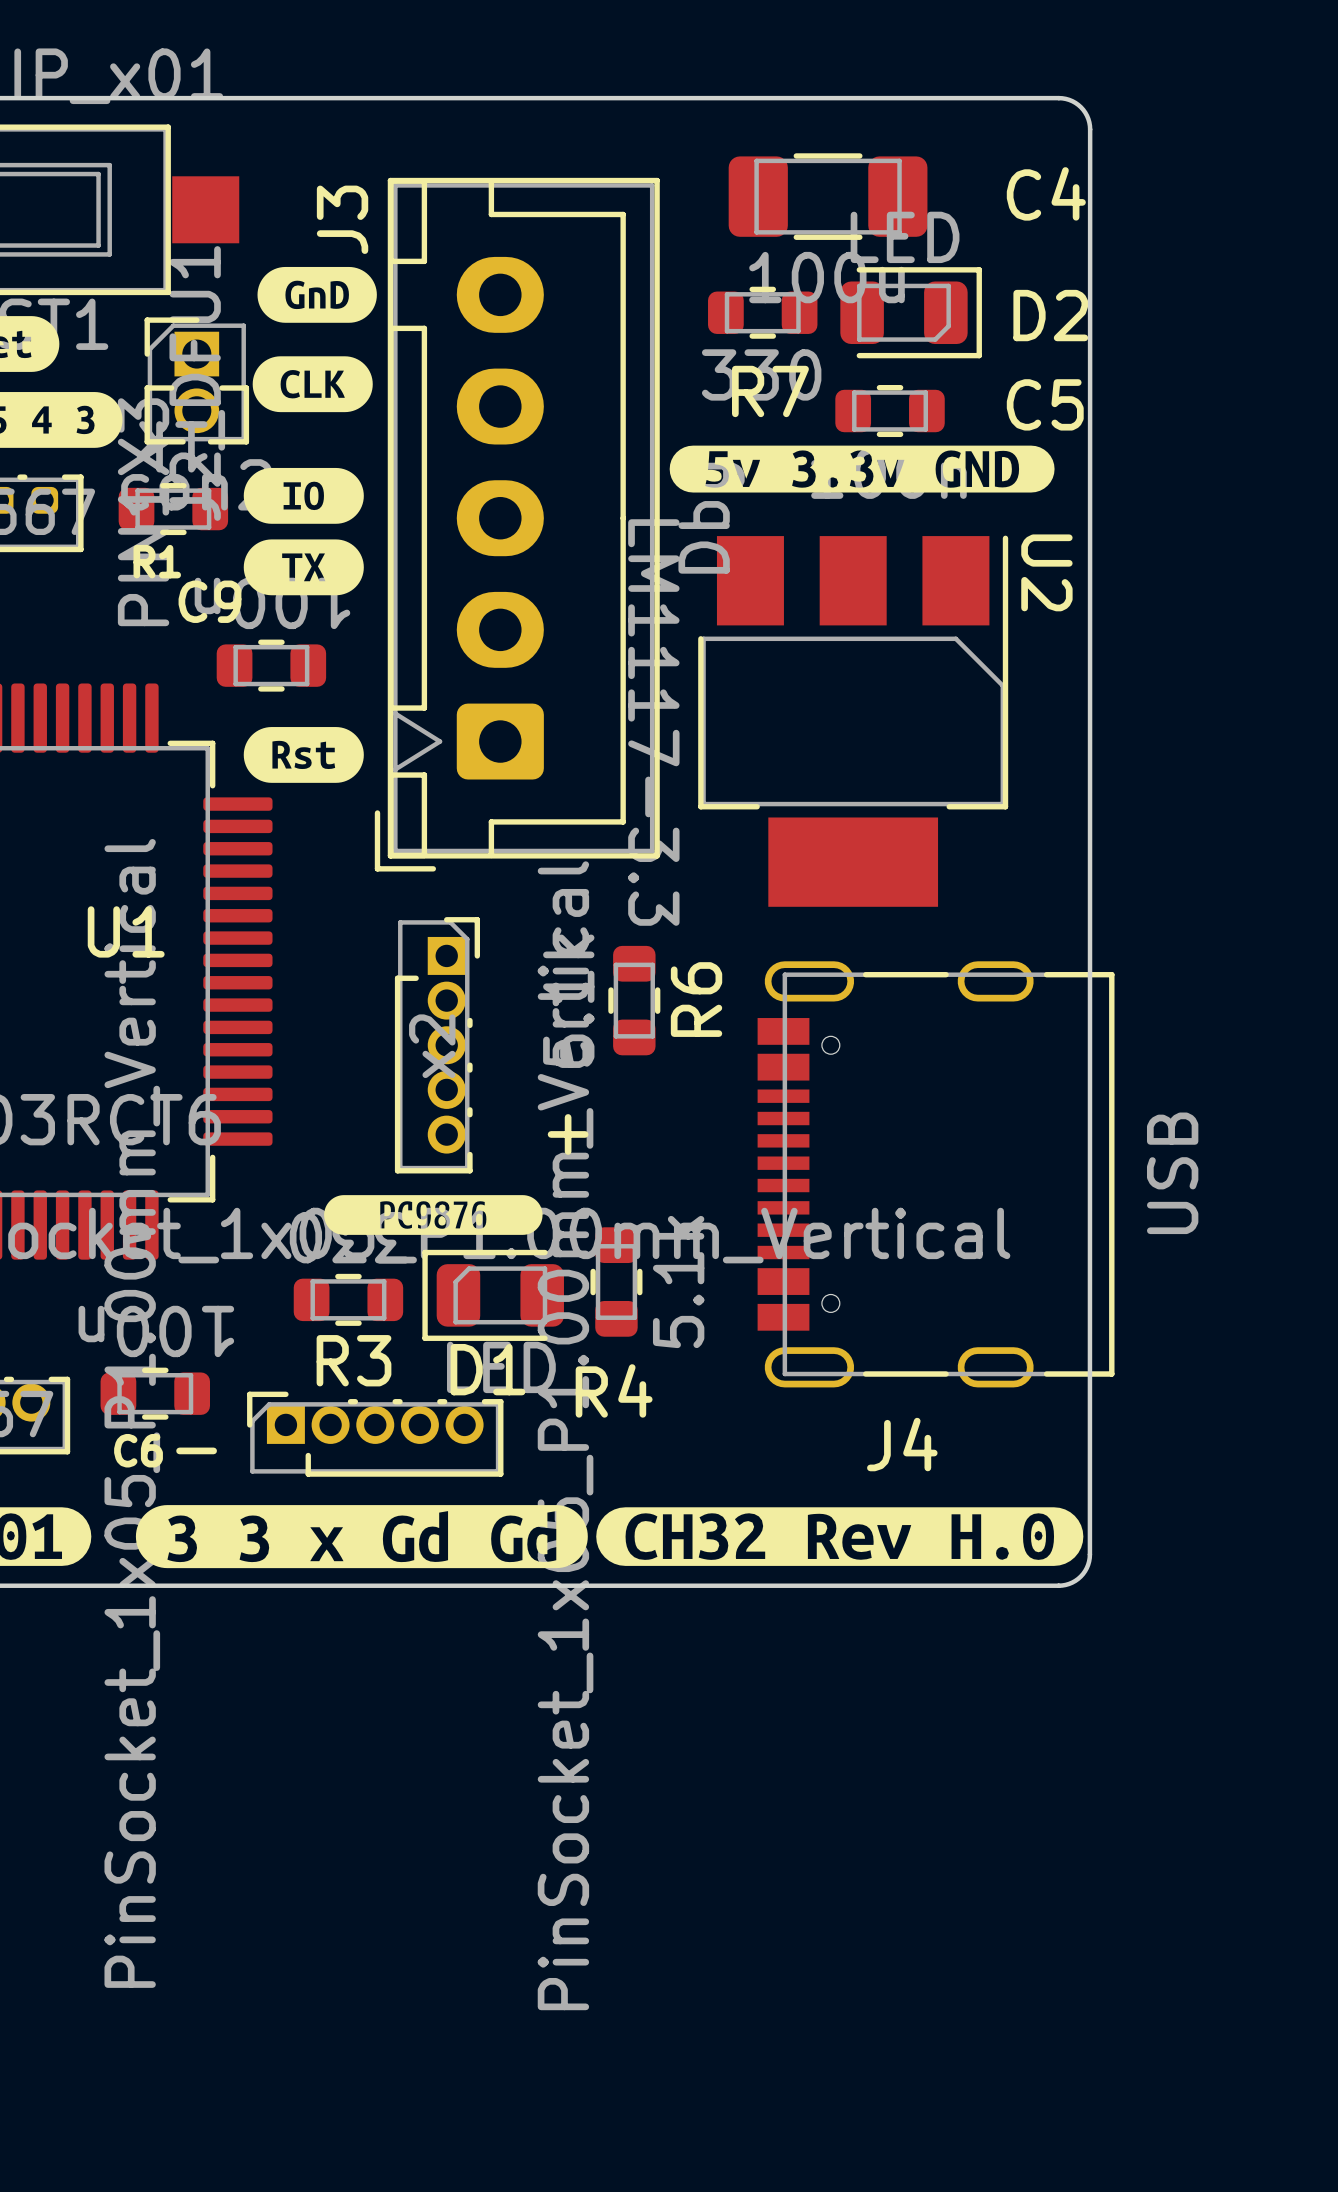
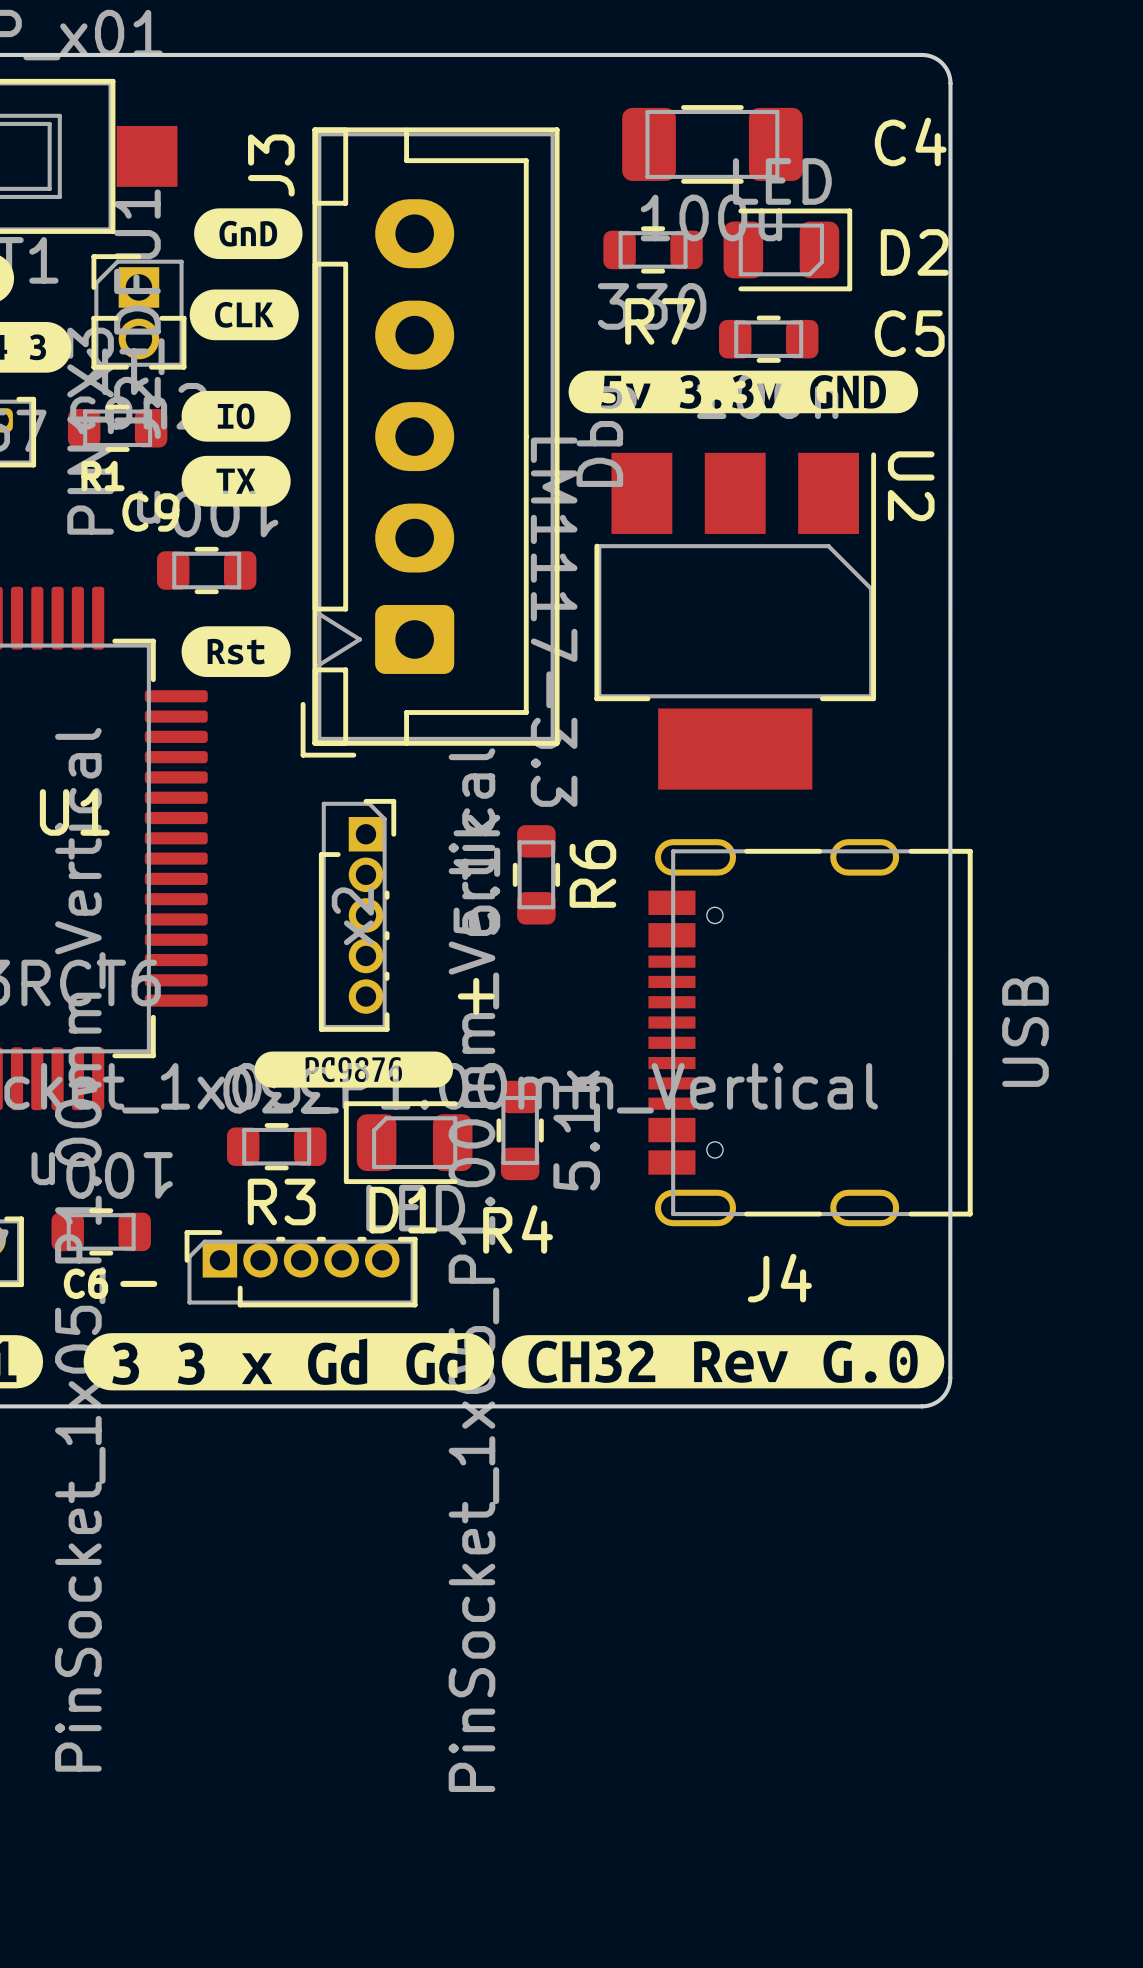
drawing shape: [596, 1507, 1084, 1566] -> [501, 1335, 945, 1389]

